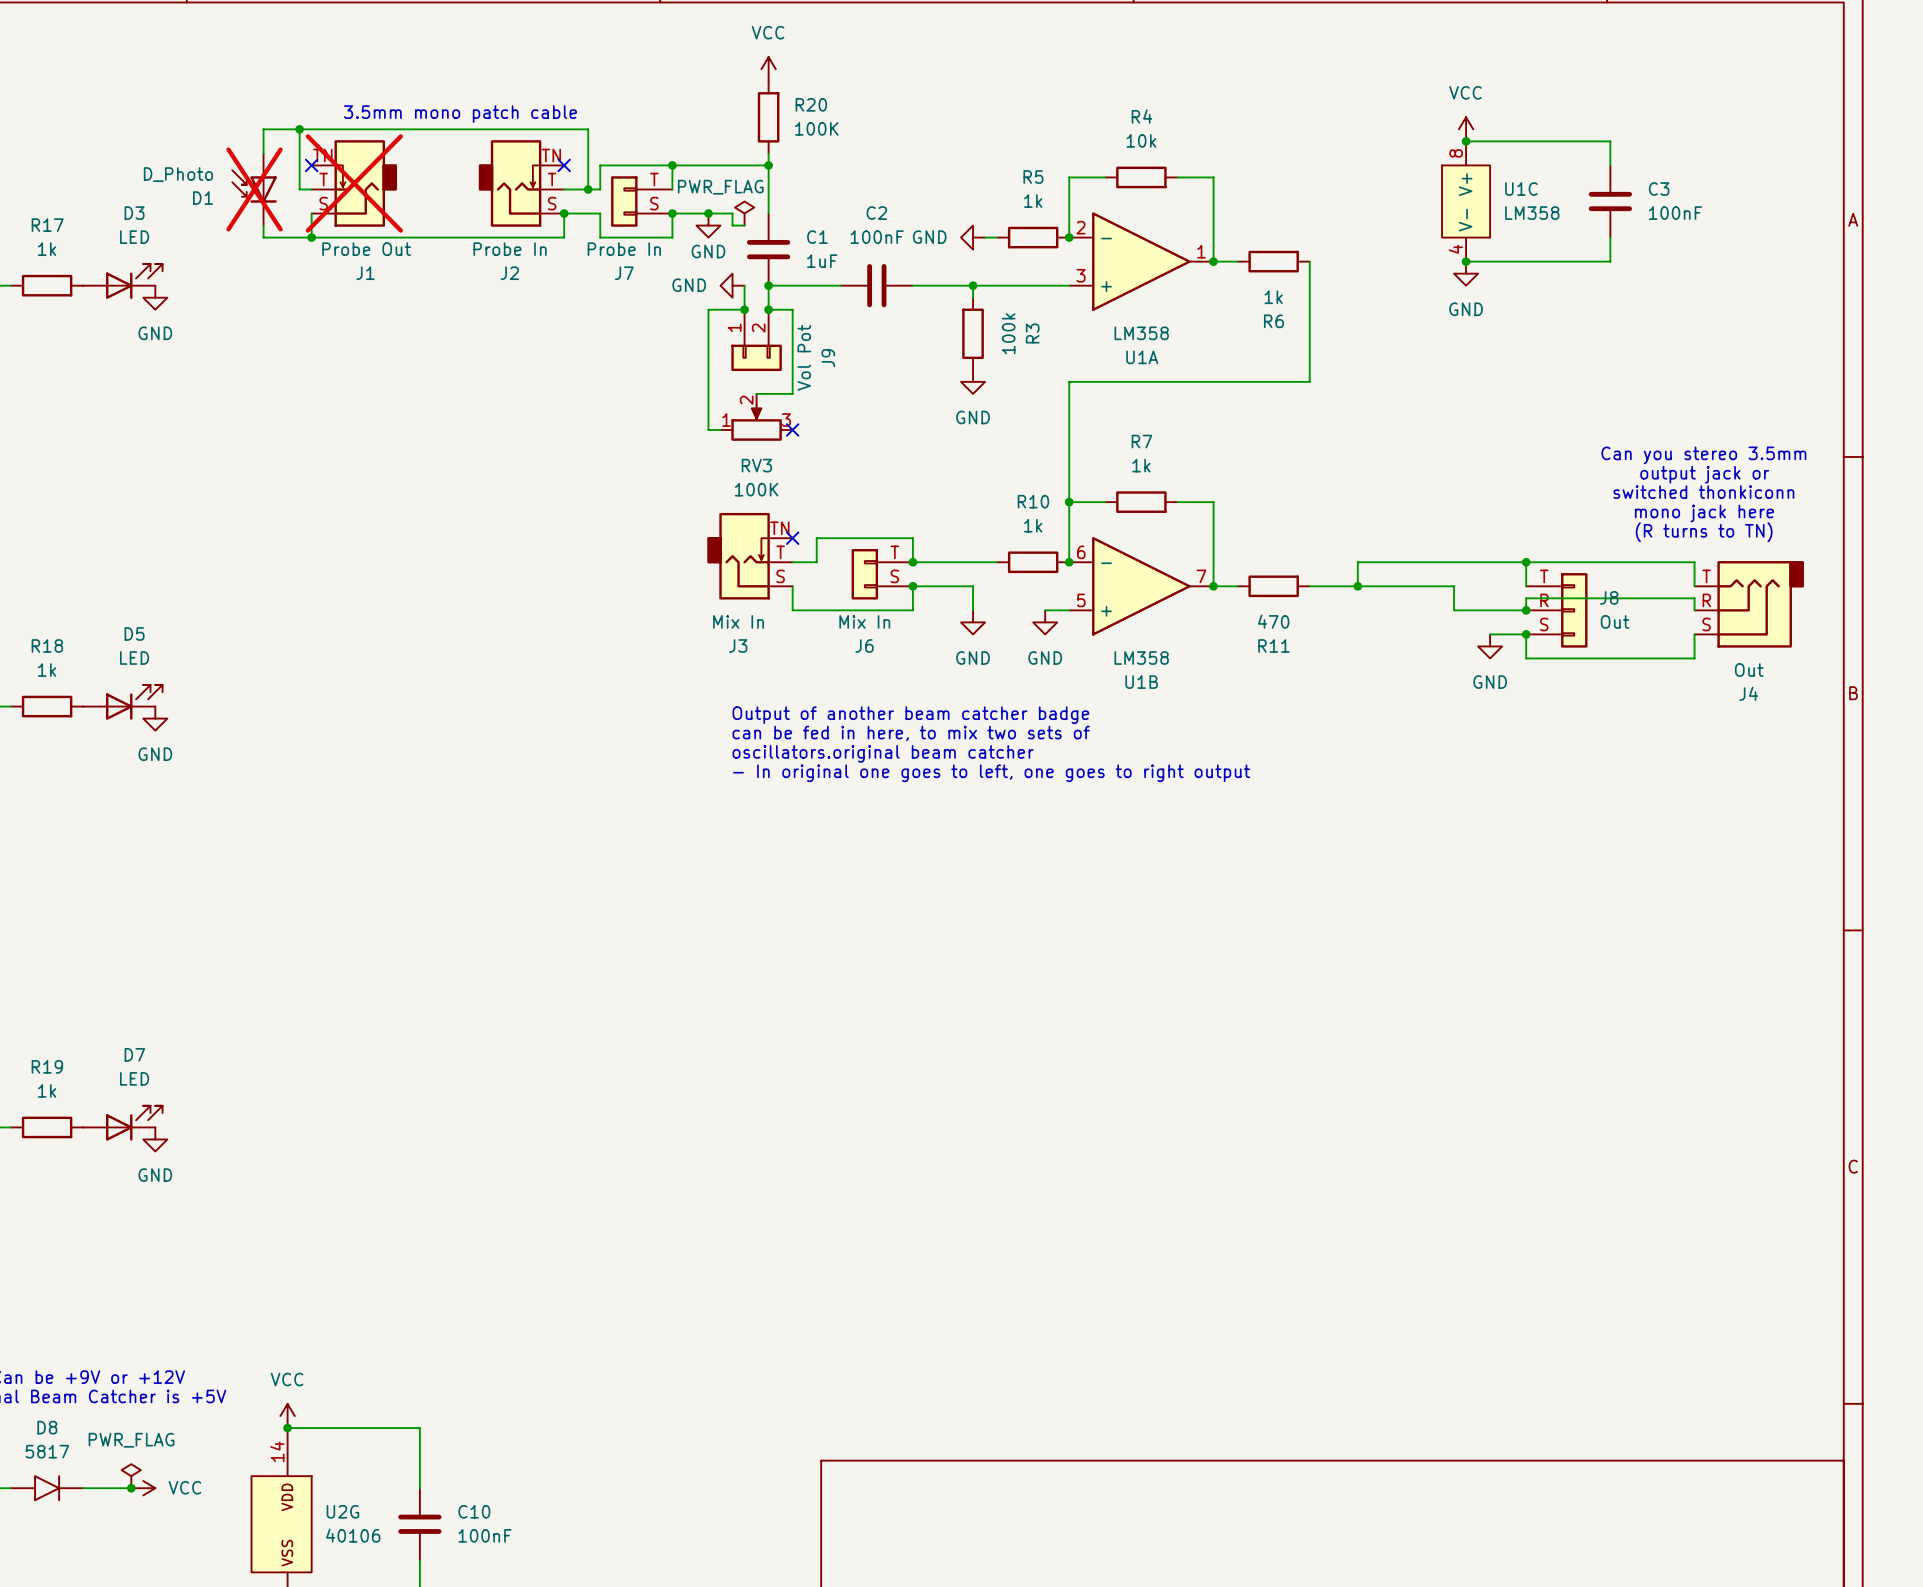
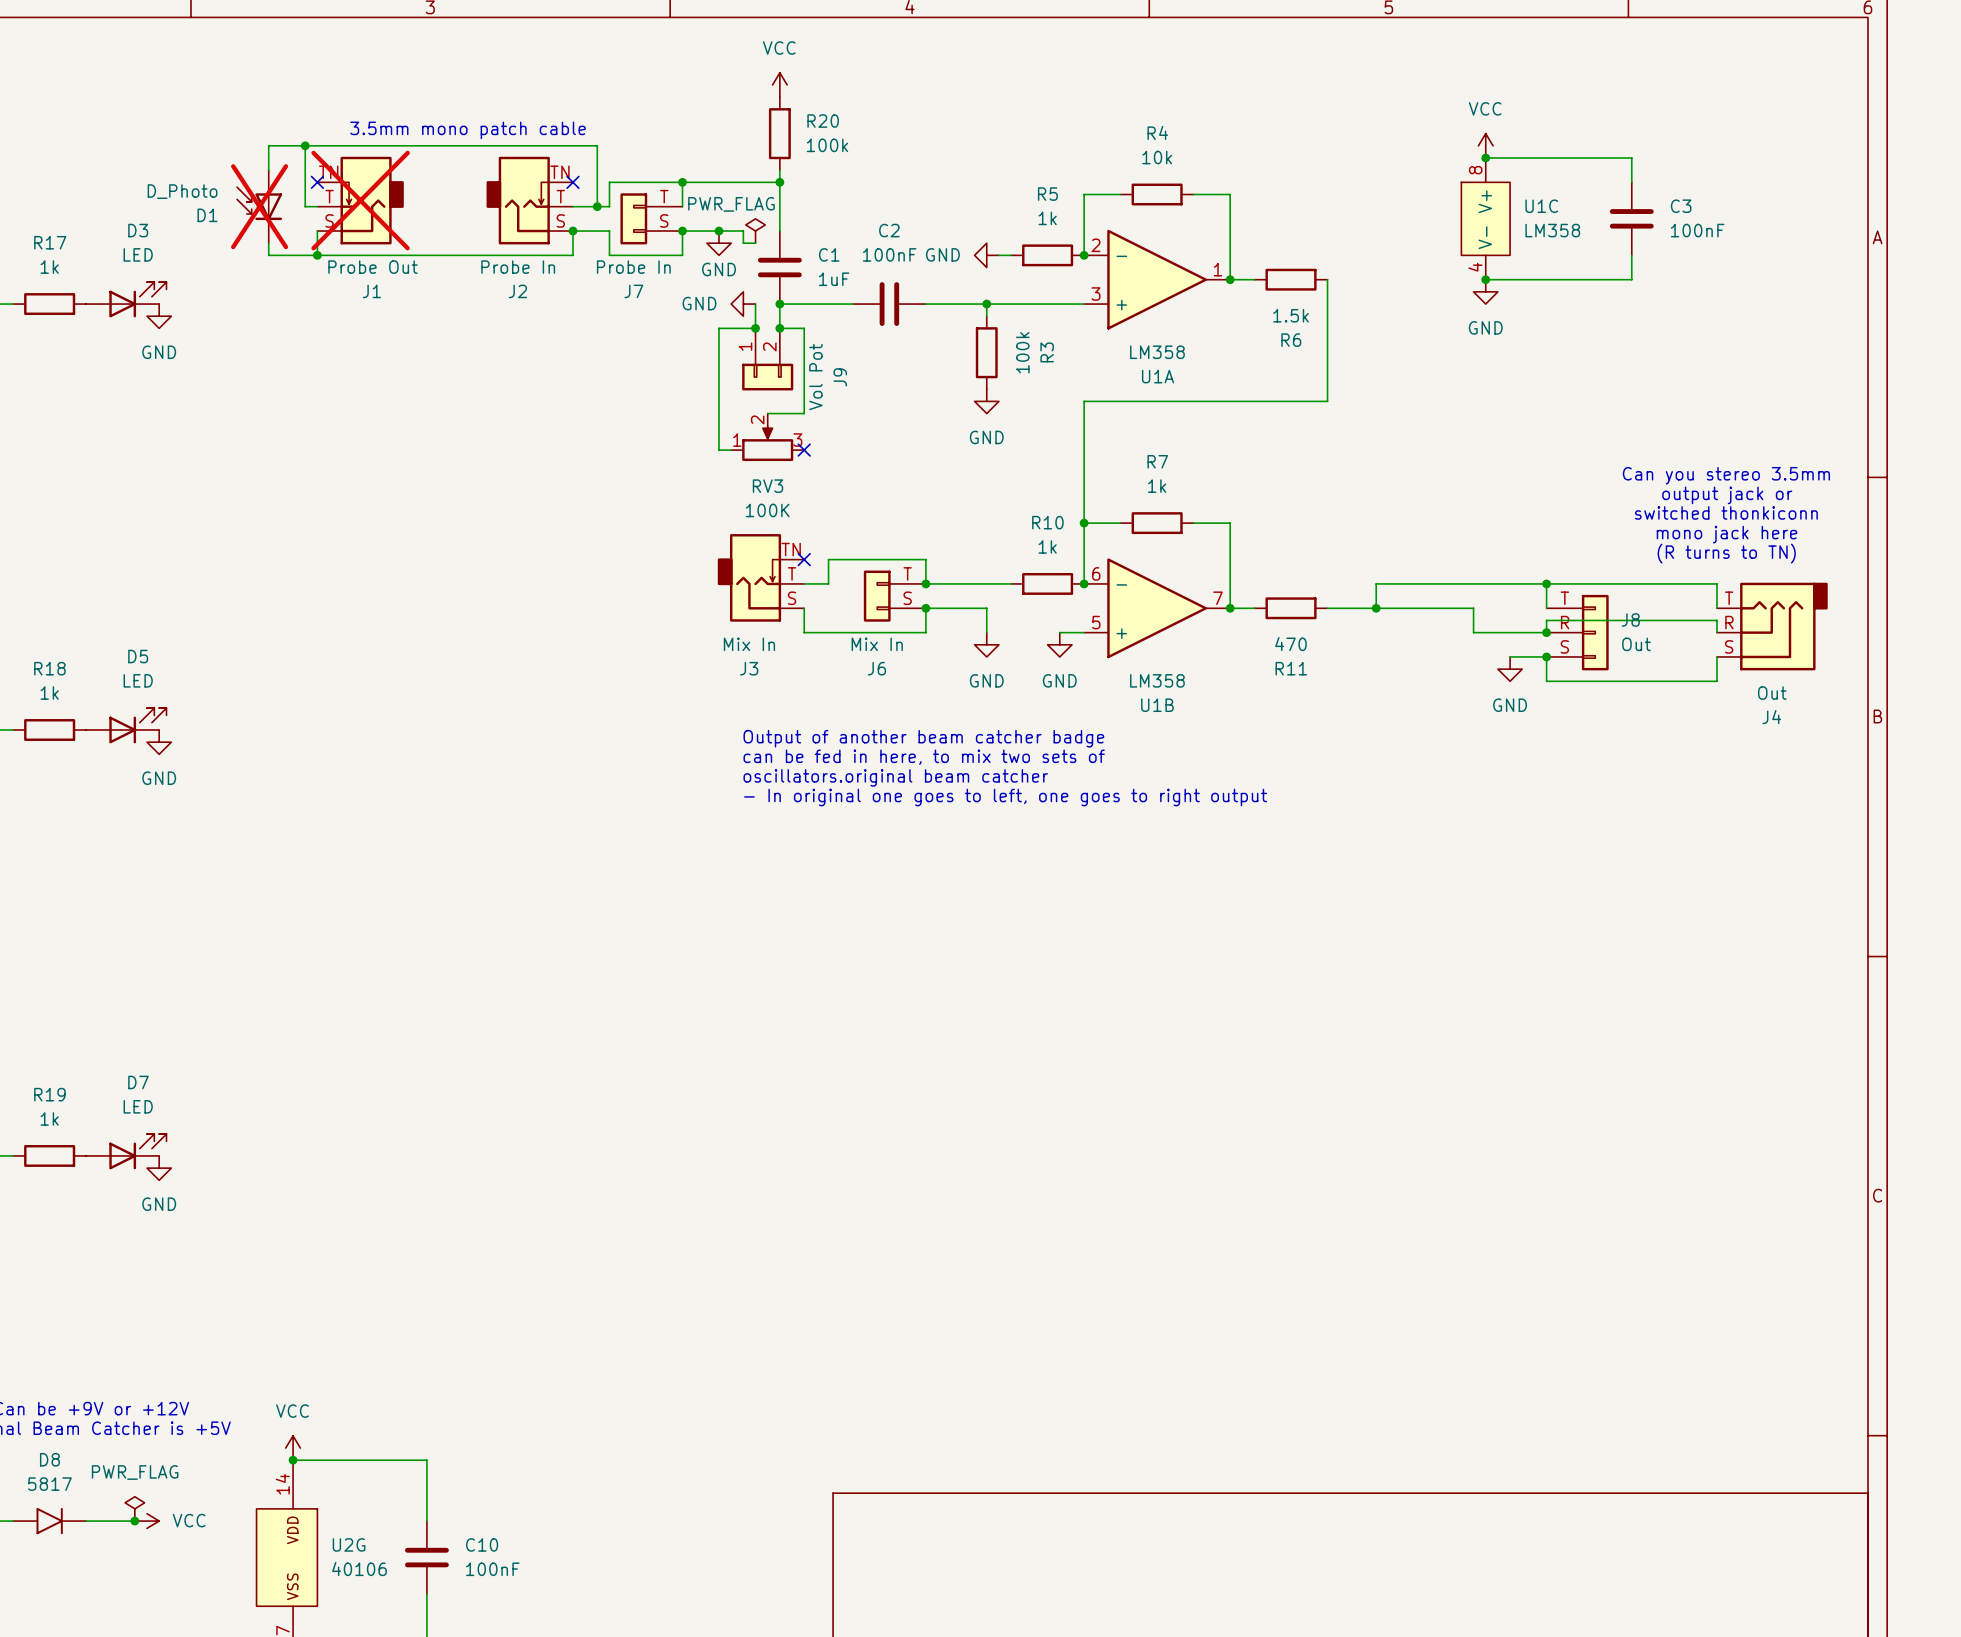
R20 value: 100K (816, 128) -> 100k (827, 145)
R6 value: 1k (1273, 297) -> 1.5k (1291, 315)

